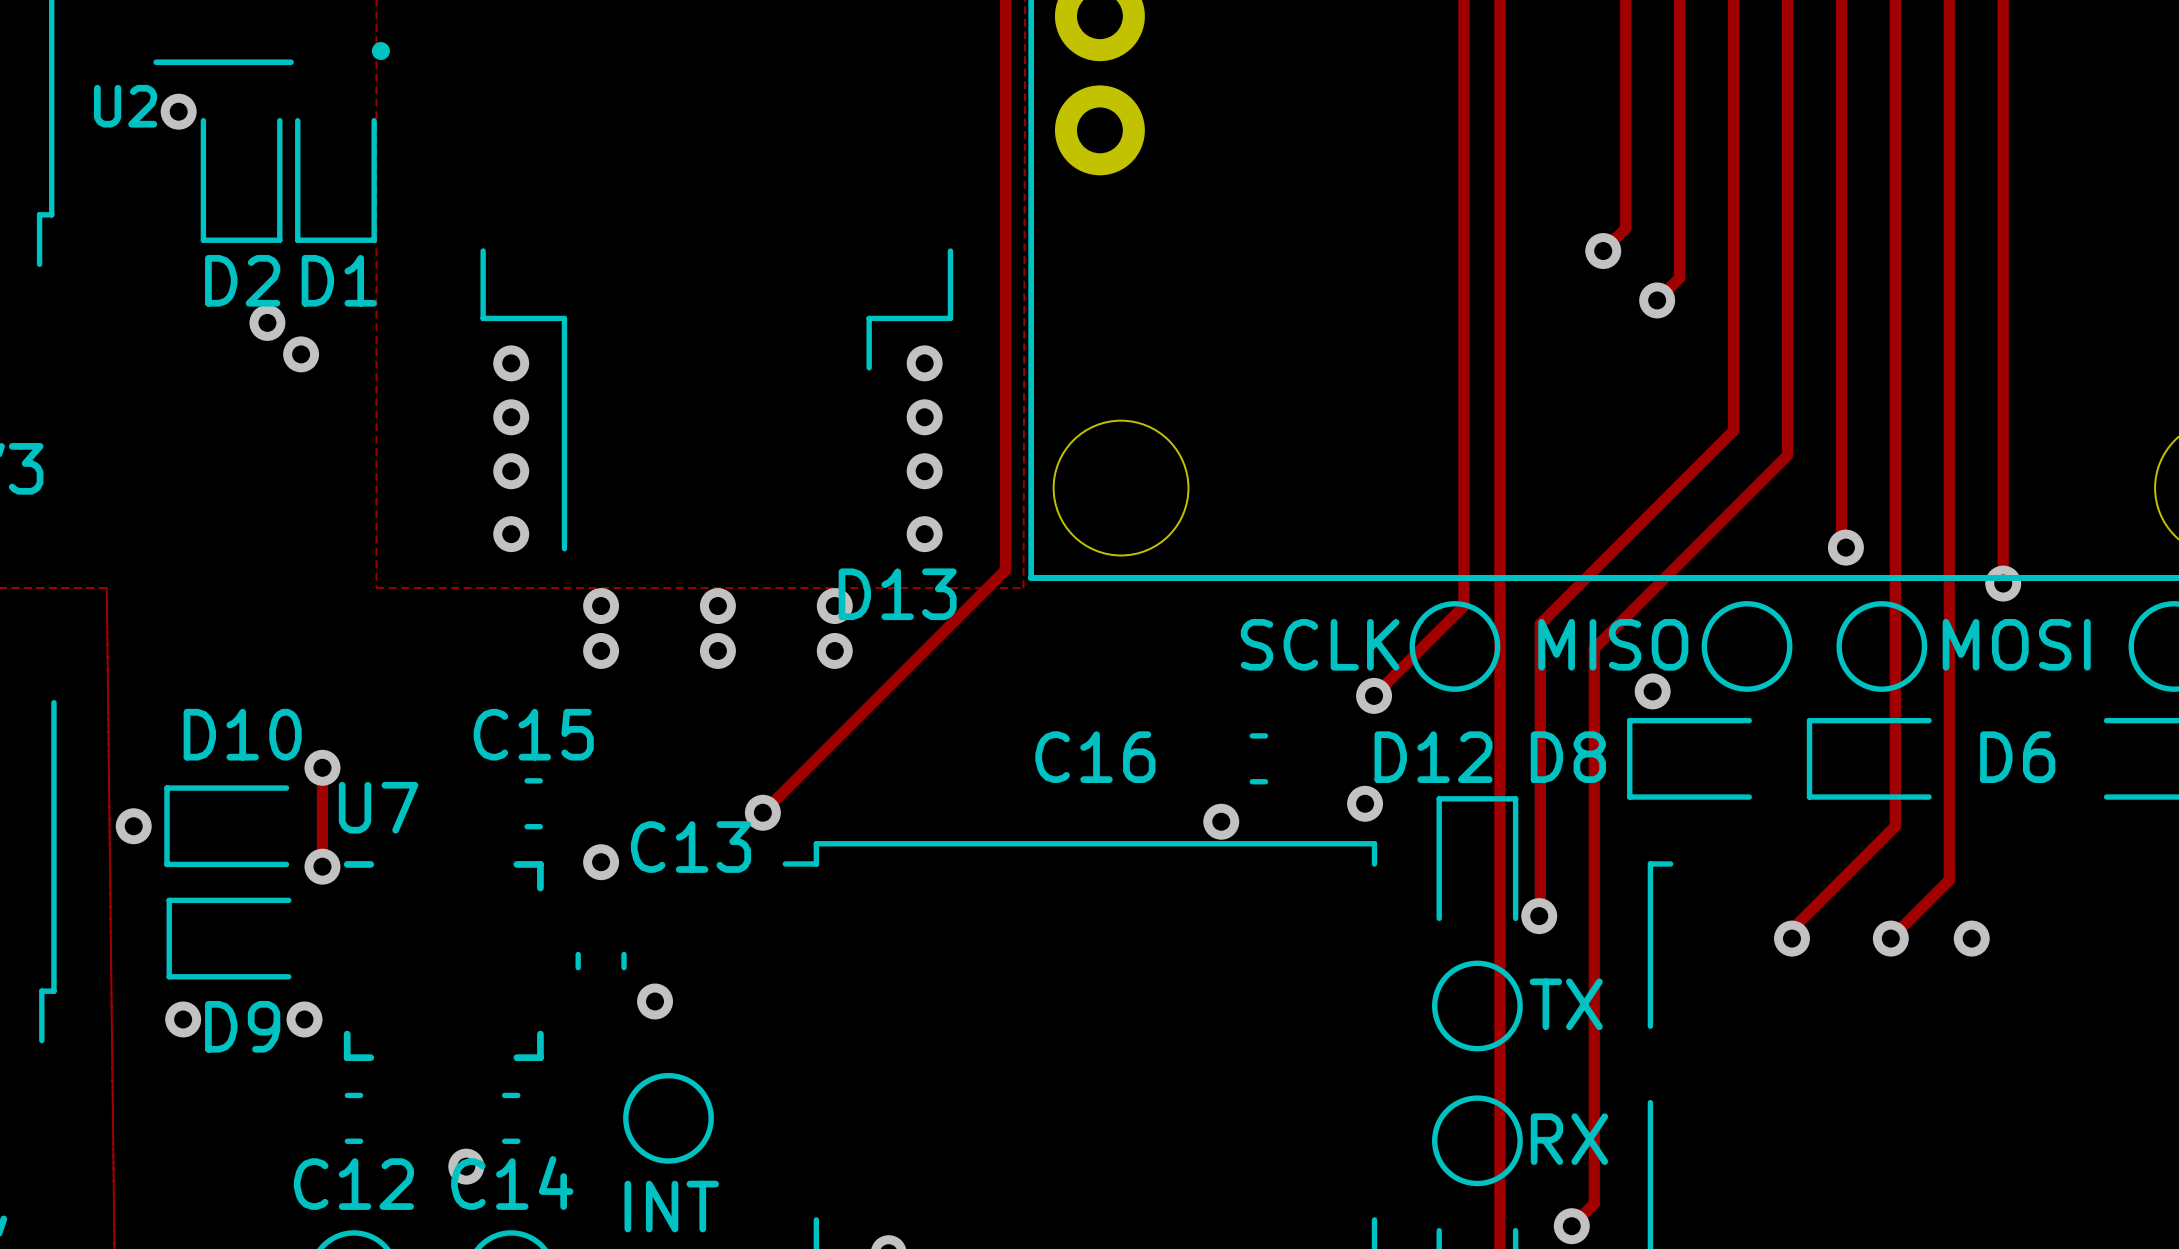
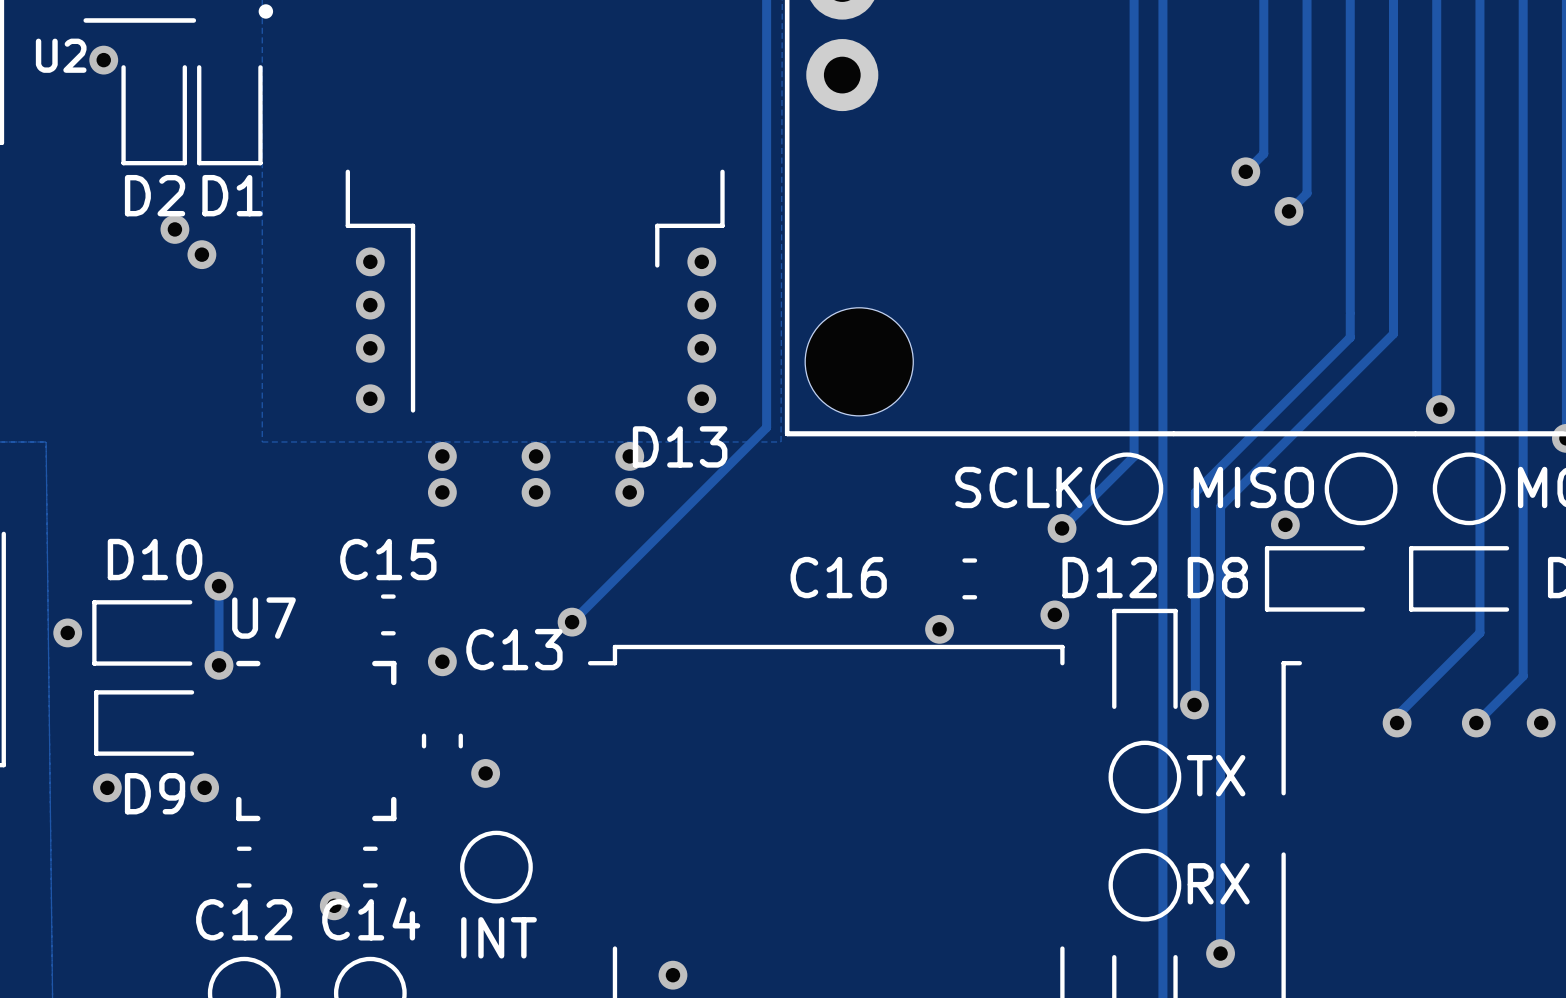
track: (1733, 430) (1540, 624) (1540, 650) -> (1350, 315) (1350, 337) (1195, 492)
track: (1787, 455) (1594, 648) (1594, 1203) (1571, 1226) -> (1393, 333) (1220, 506) (1220, 953)

